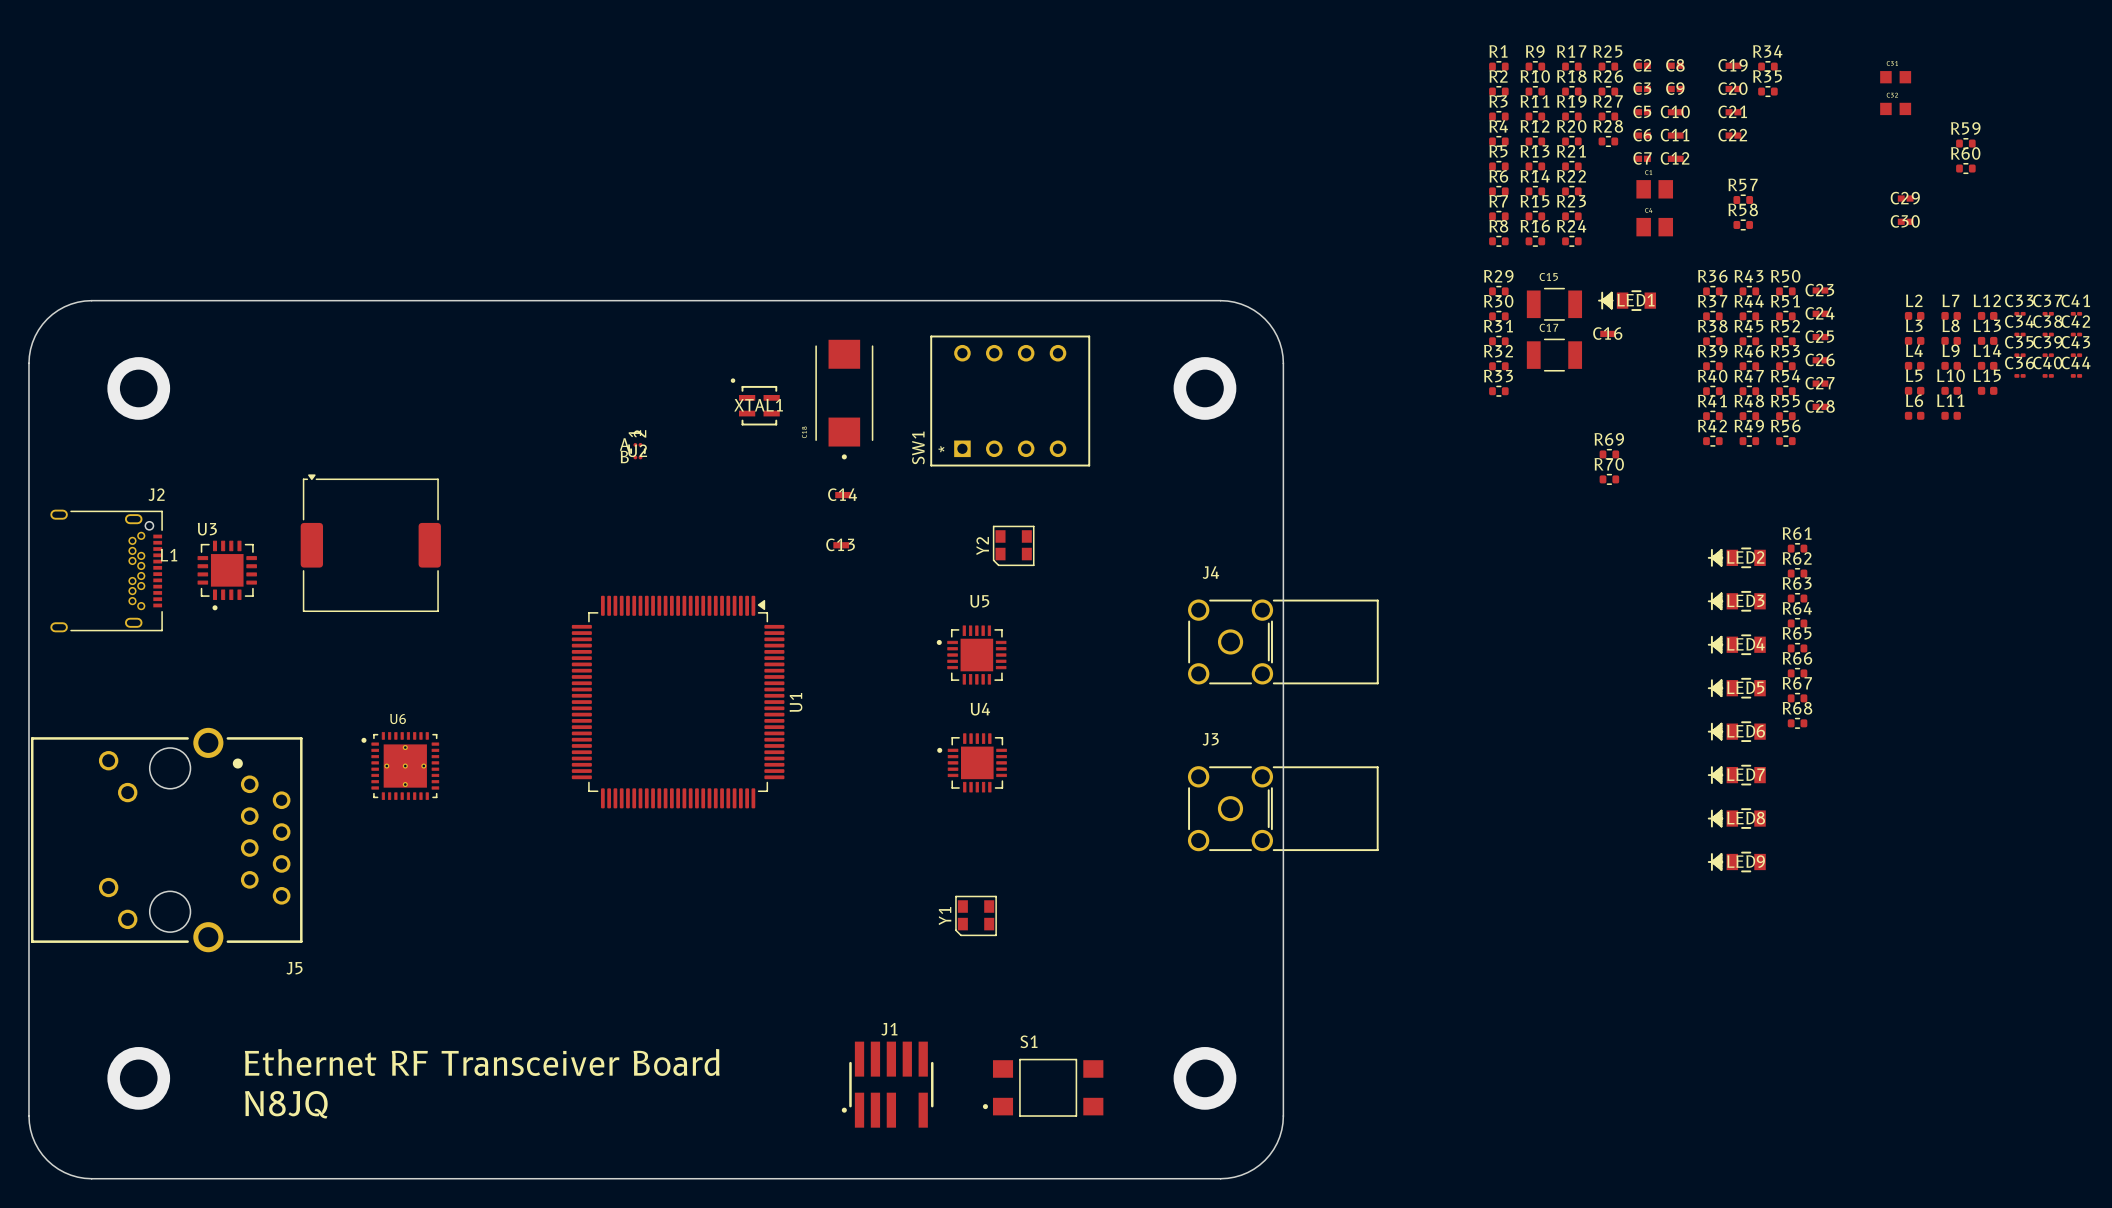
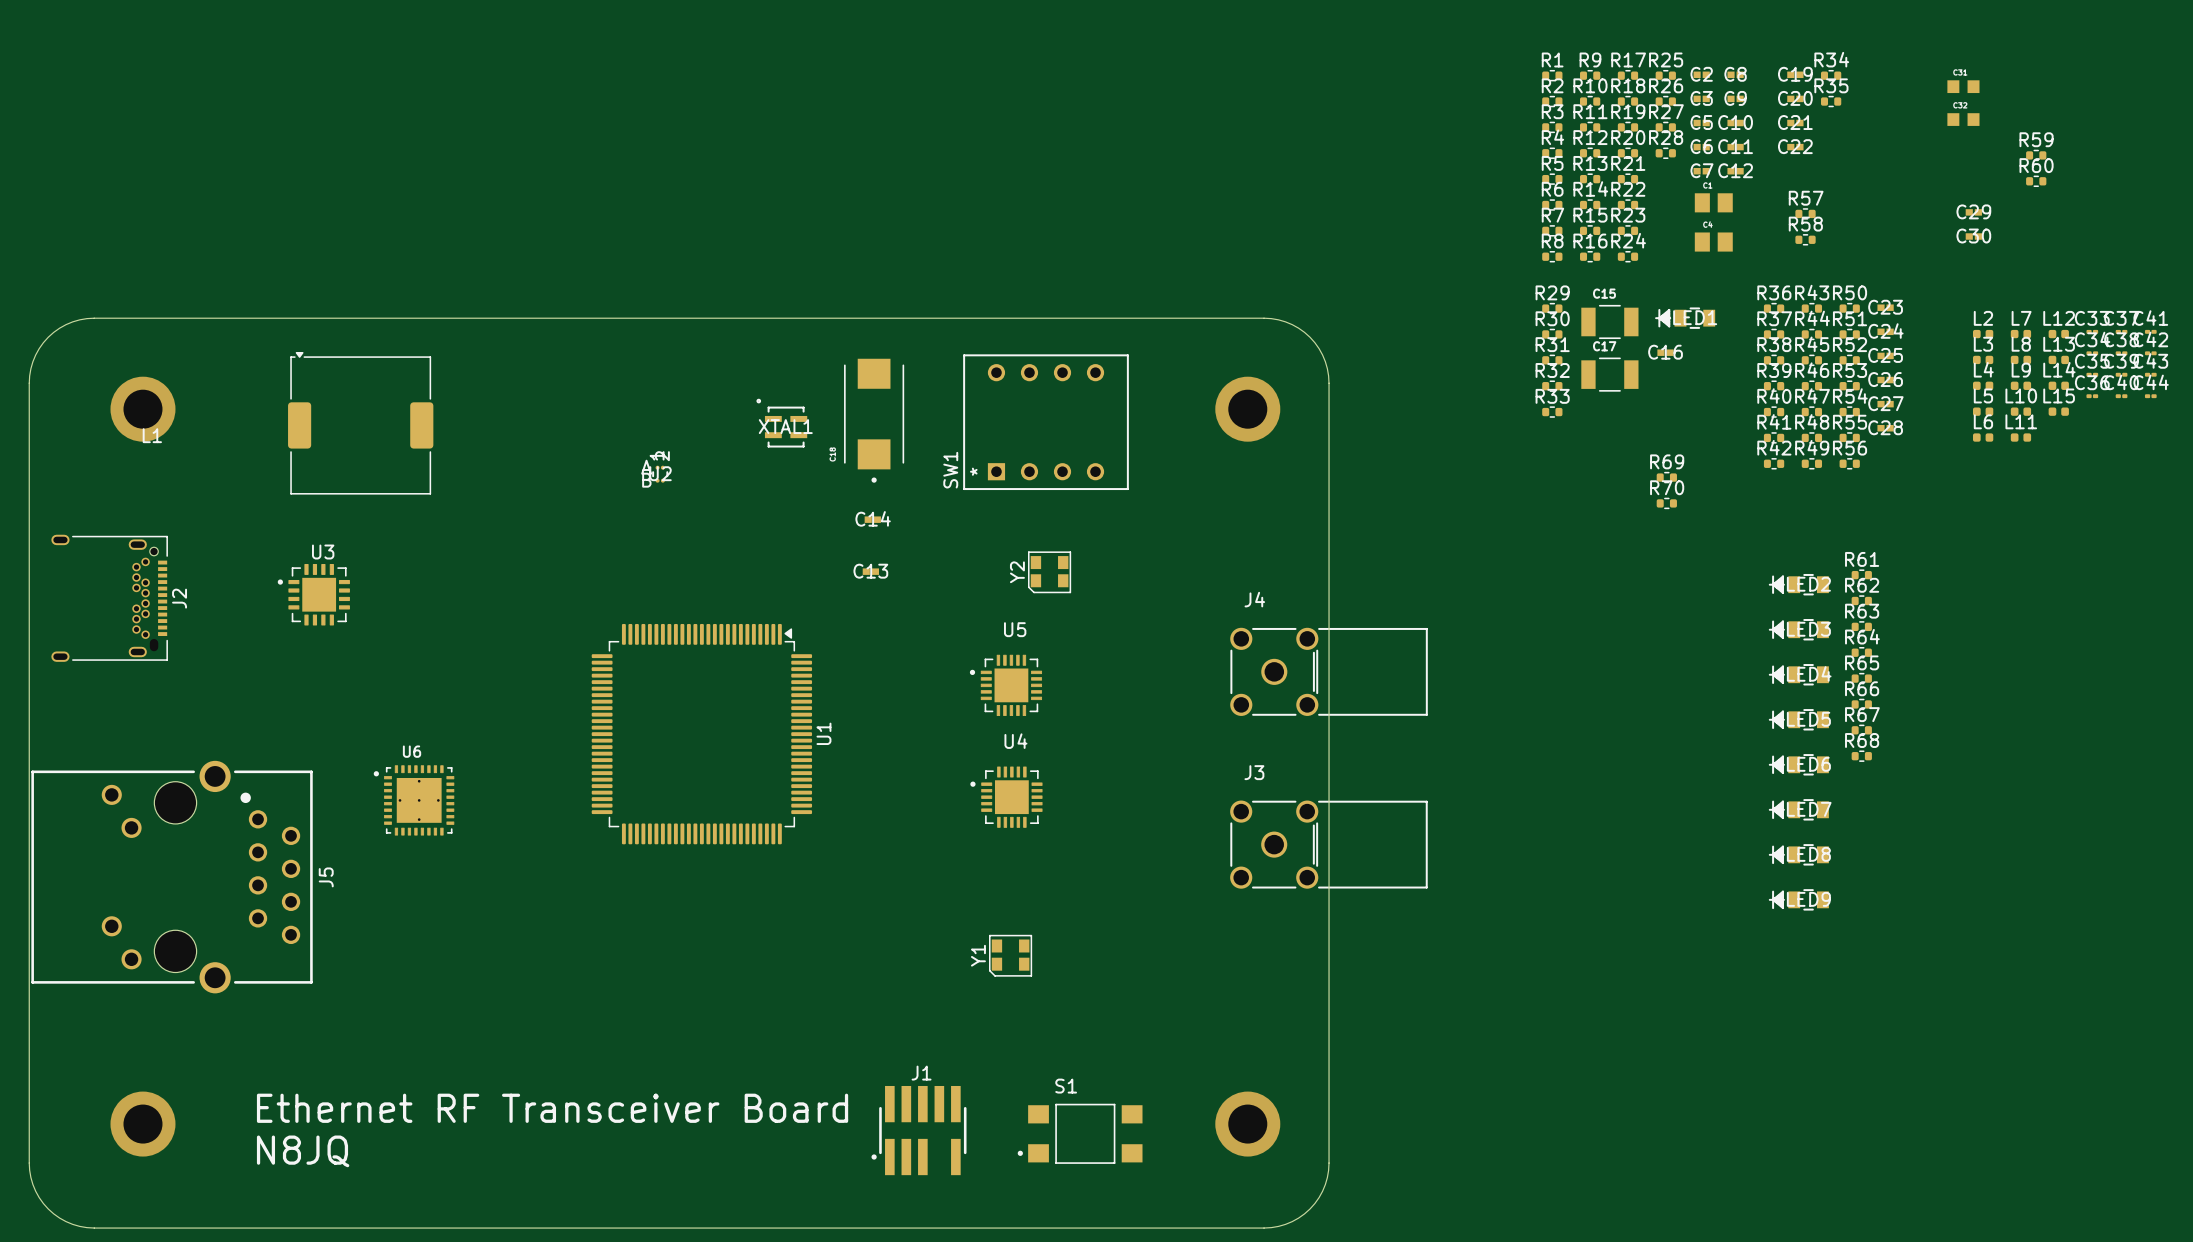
J2 name rotation: 0° (156, 494) -> 90° counterclockwise (179, 598)
J2 name position: J2 (156, 494) -> J2 (179, 598)
U3 name position: U3 (207, 529) -> U3 (323, 552)
L1 position: (370, 543) -> (360, 423)
U3 rotation: 0° (227, 575) -> 90° clockwise (313, 594)
U3 position: (227, 575) -> (313, 594)
J5 name rotation: 0° (294, 968) -> 90° counterclockwise (326, 877)
J5 name position: J5 (294, 968) -> J5 (326, 877)

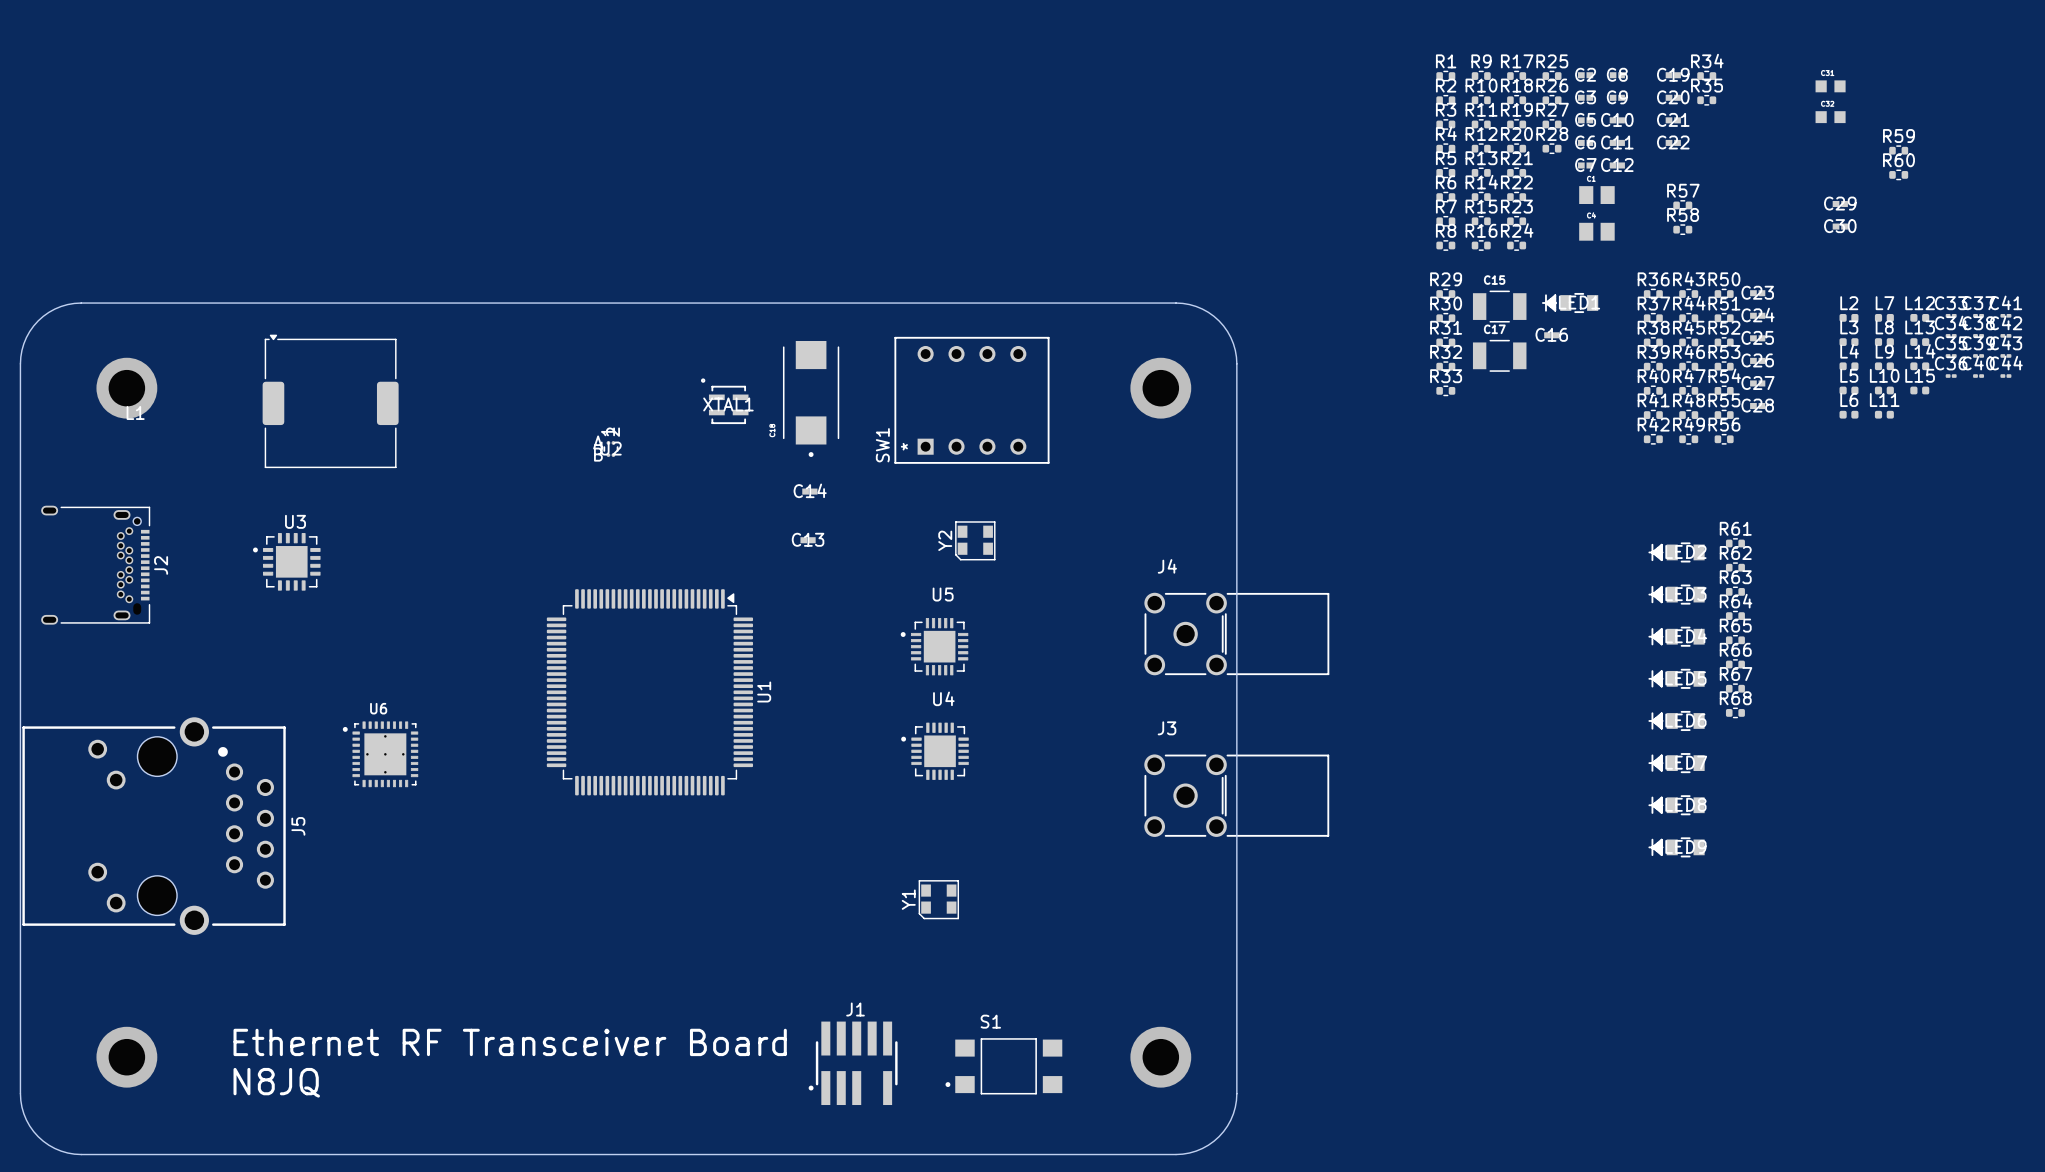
R69: (1666, 477) -> none
R70: (1666, 503) -> none

